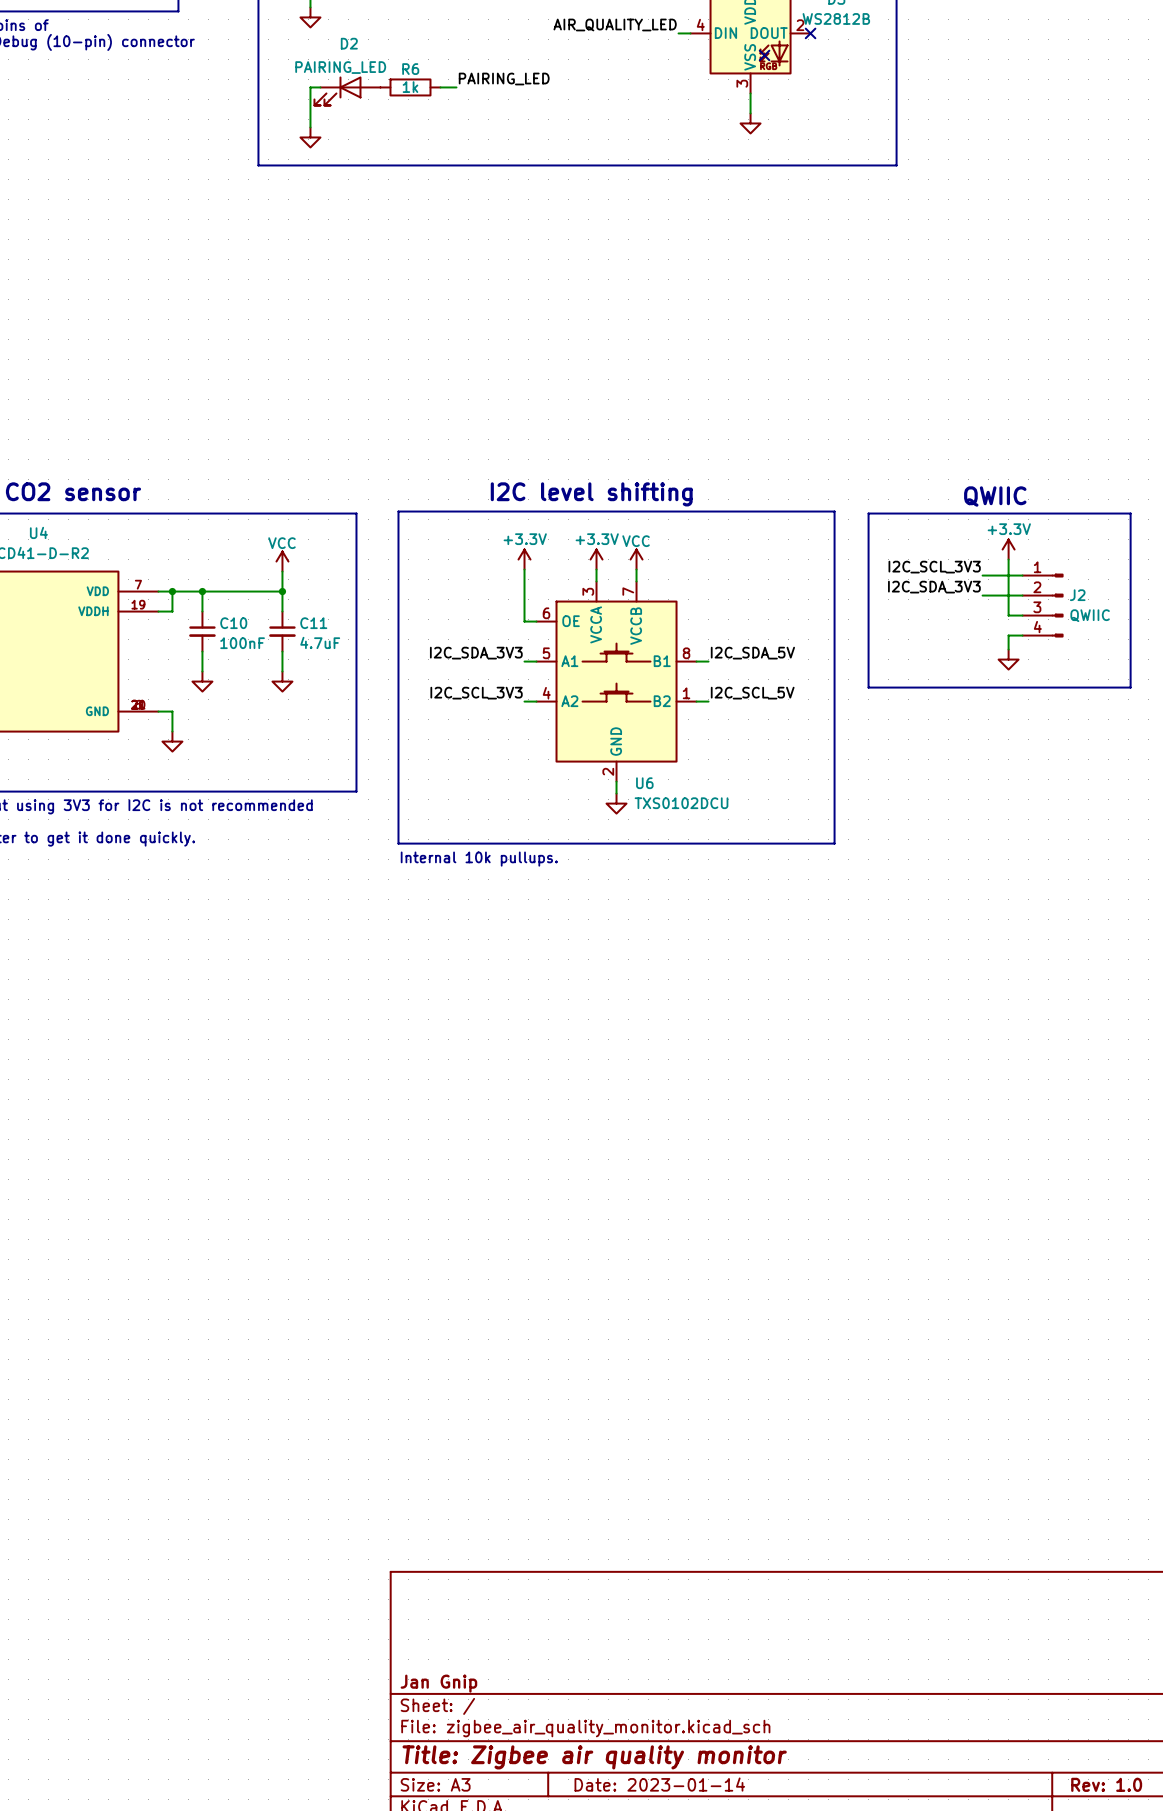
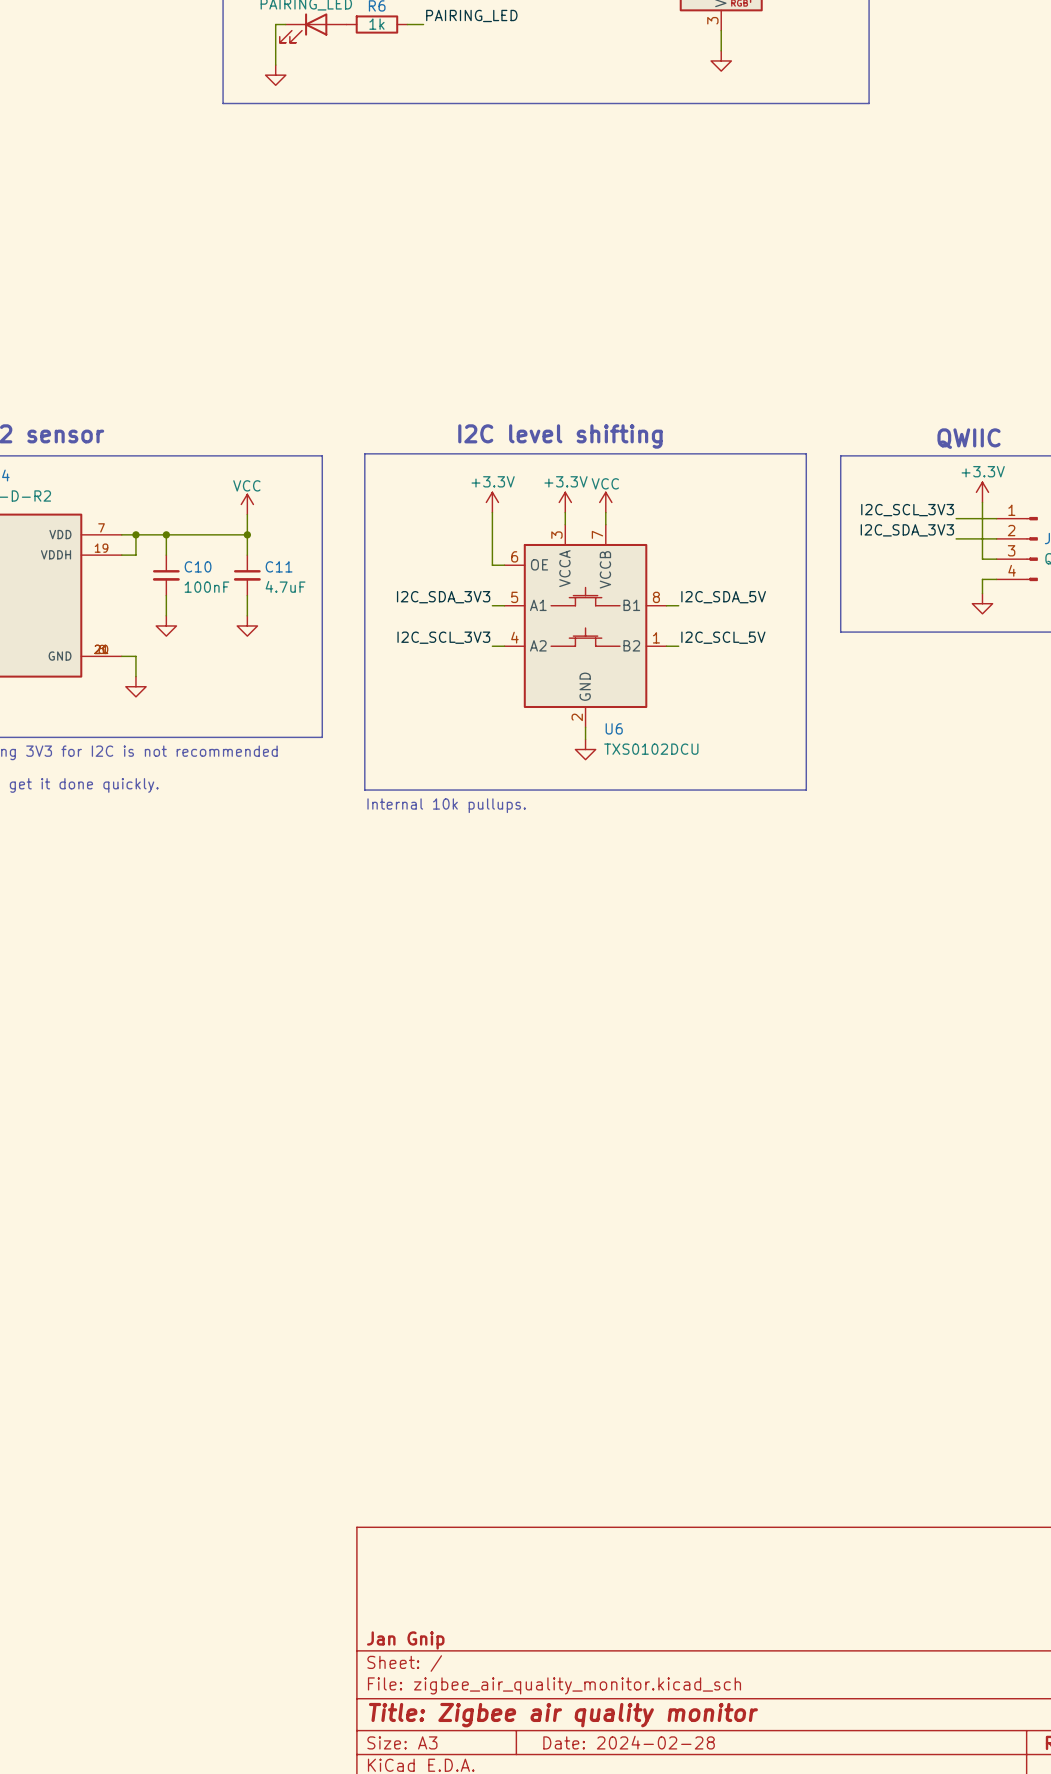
title block: Date: 2023-01-14 (659, 1784) -> Date: 2024-02-28 (629, 1742)

